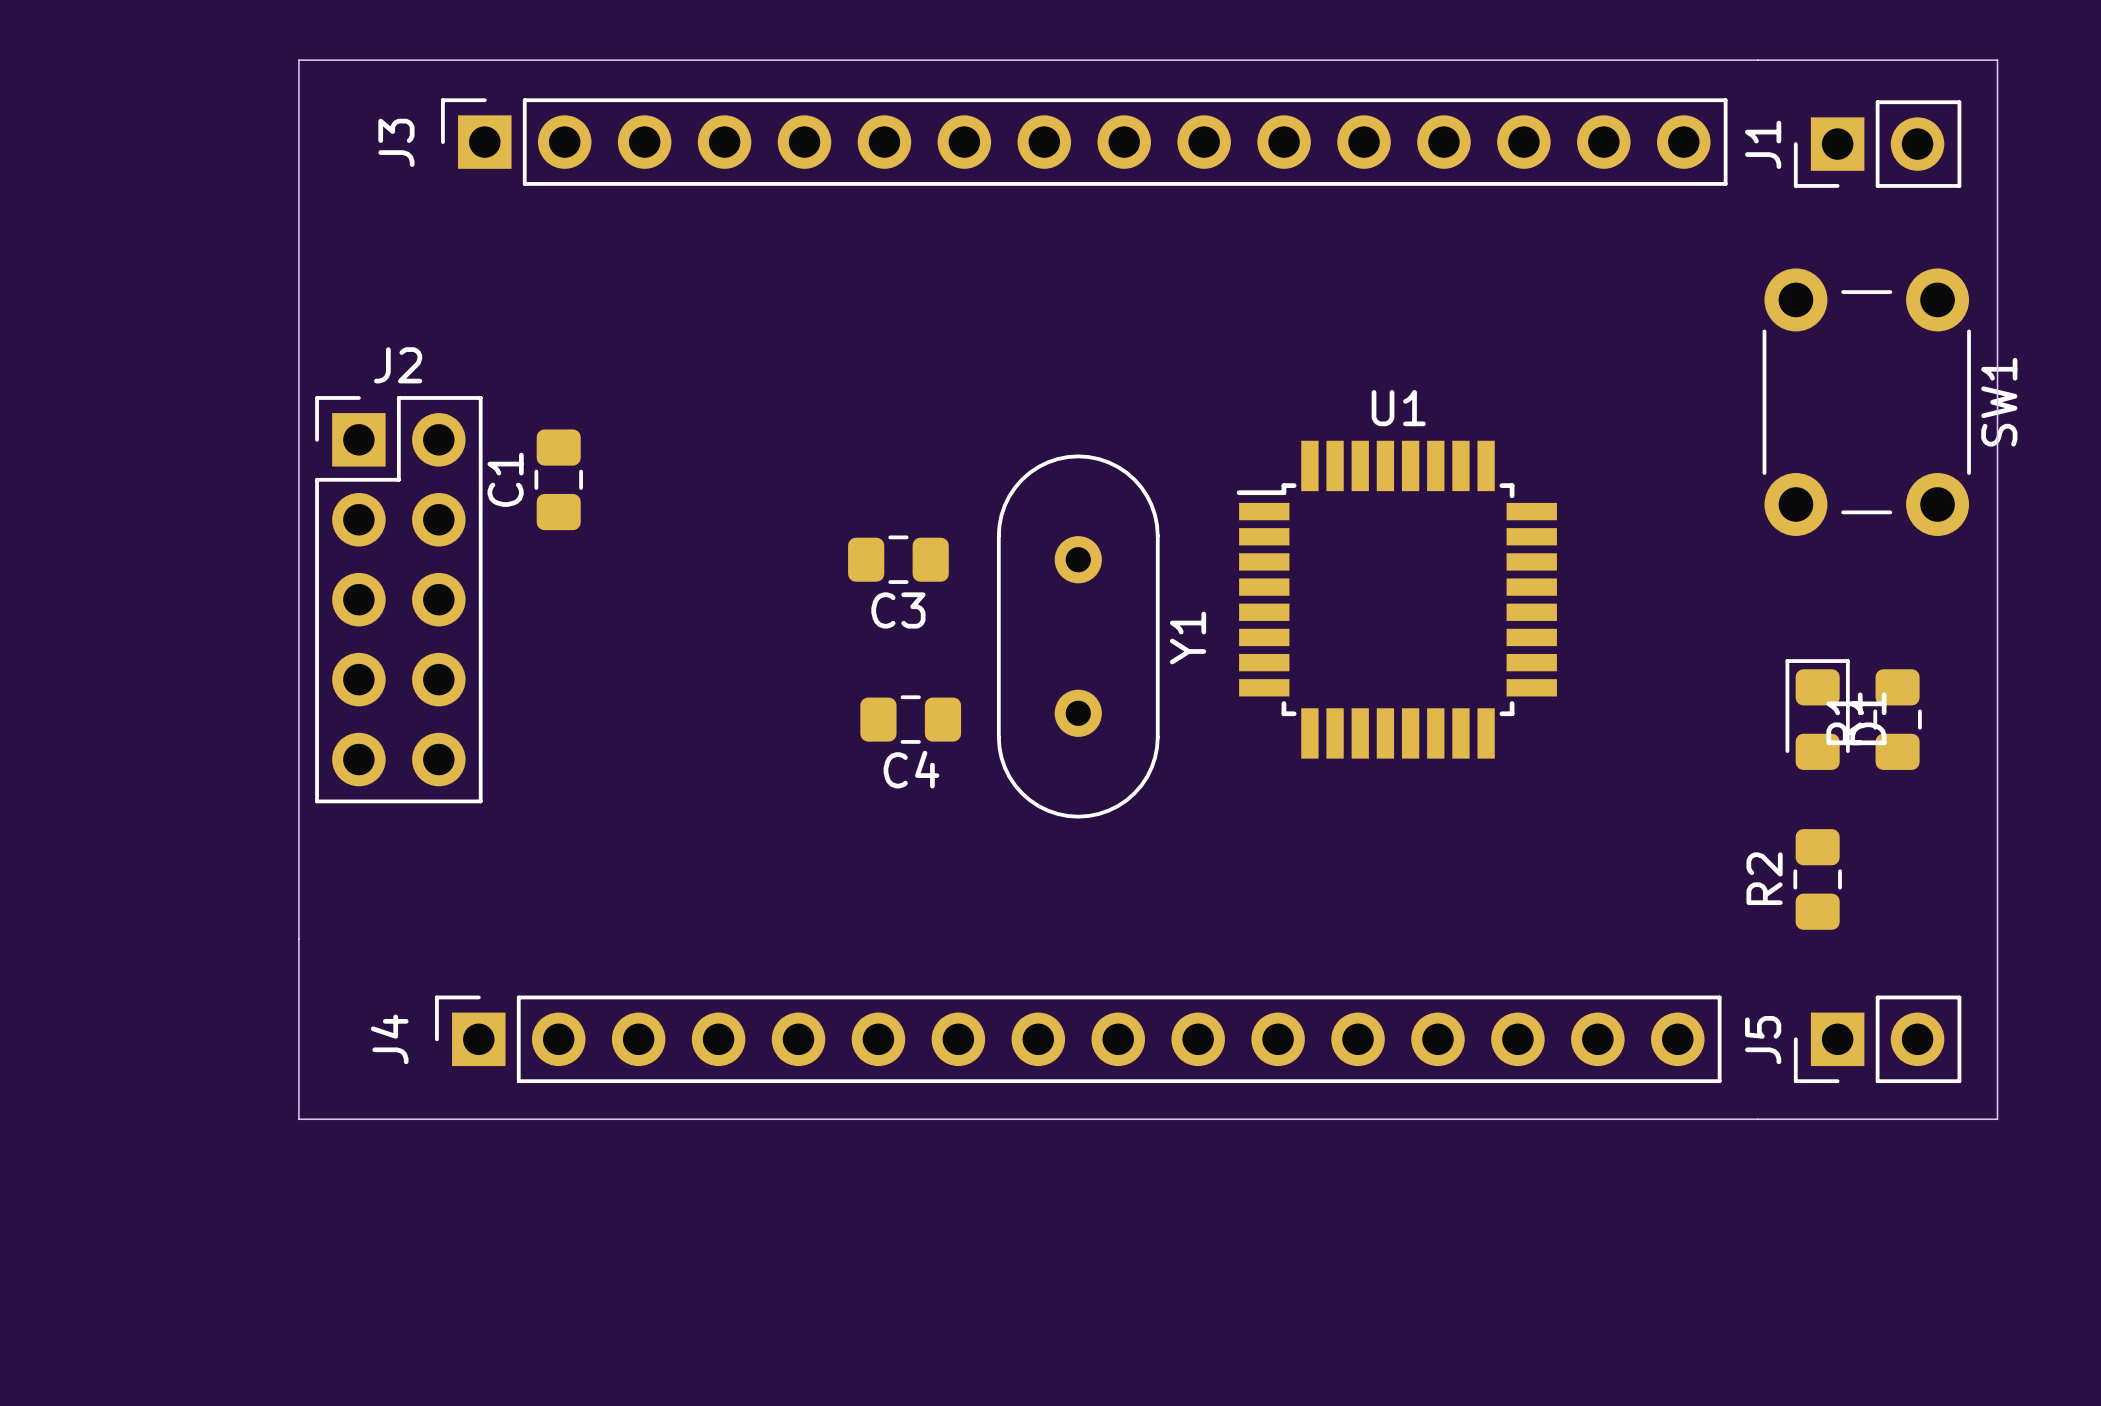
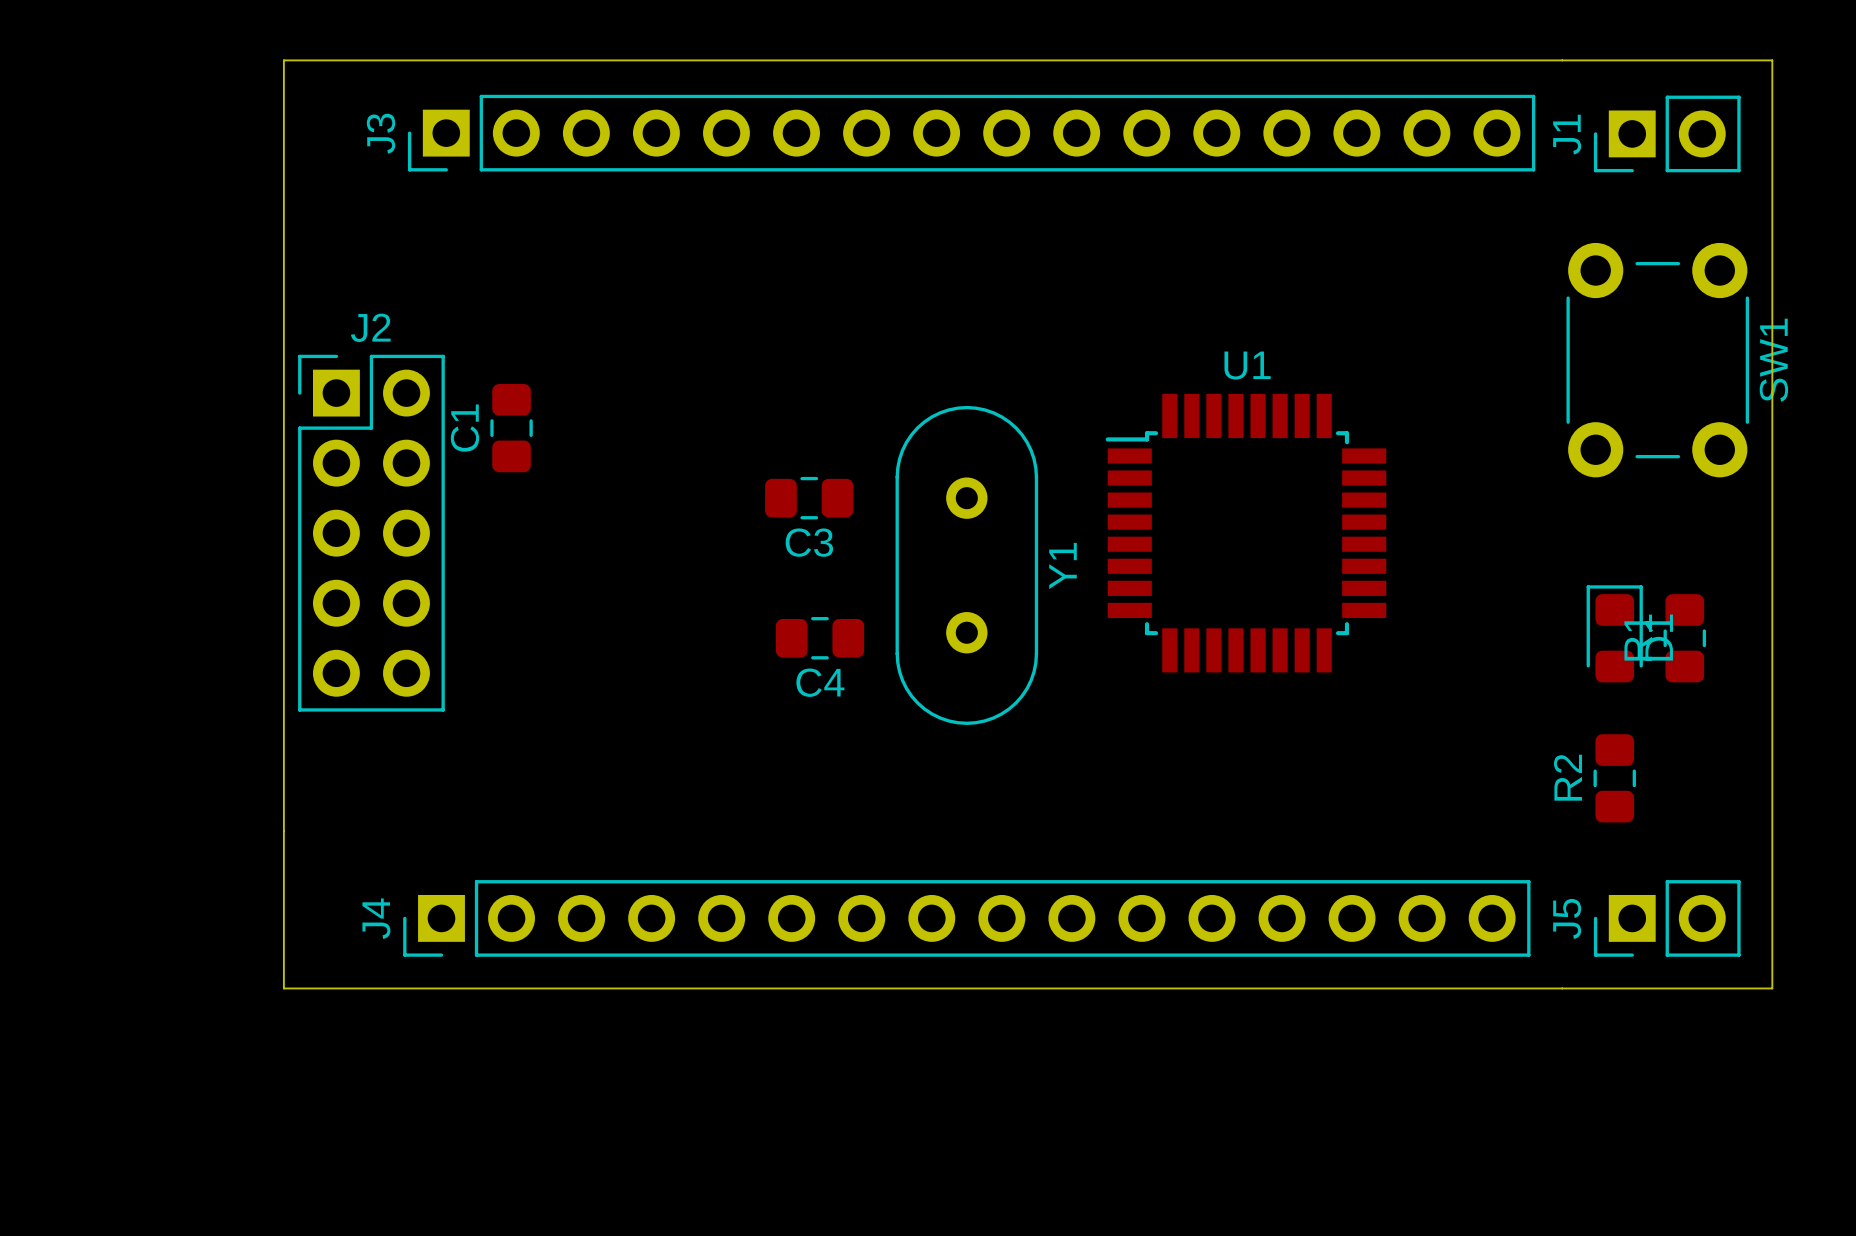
J3 footprint: [441, 98, 1728, 186] -> [407, 94, 1536, 172]
J4 footprint: [435, 995, 1722, 1084] -> [403, 880, 1531, 957]

